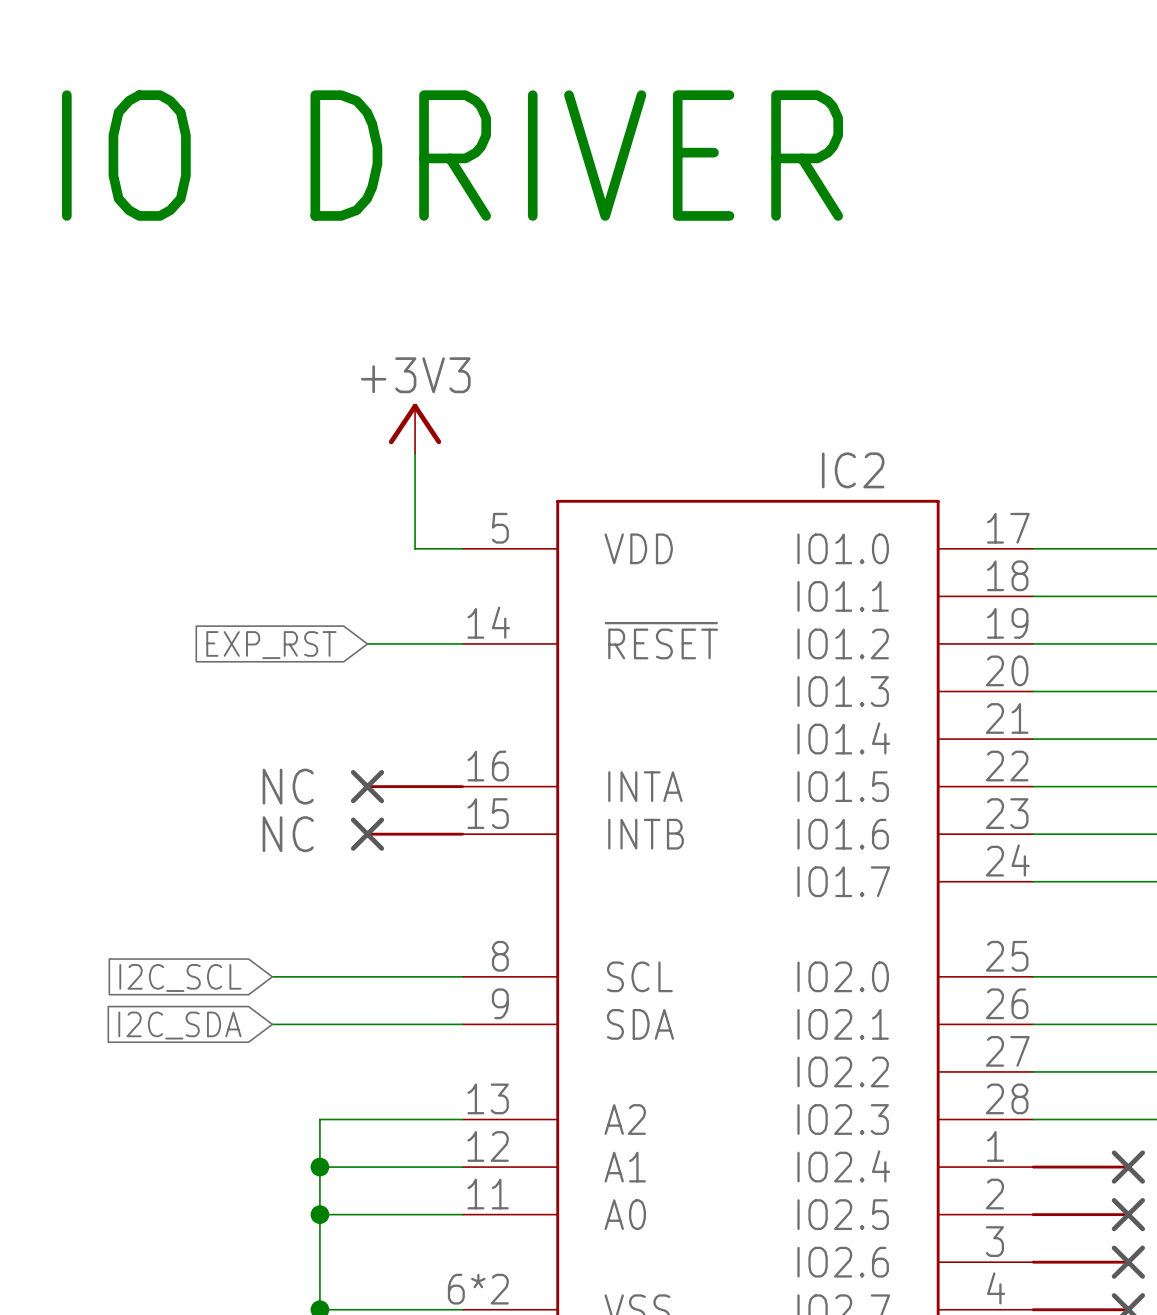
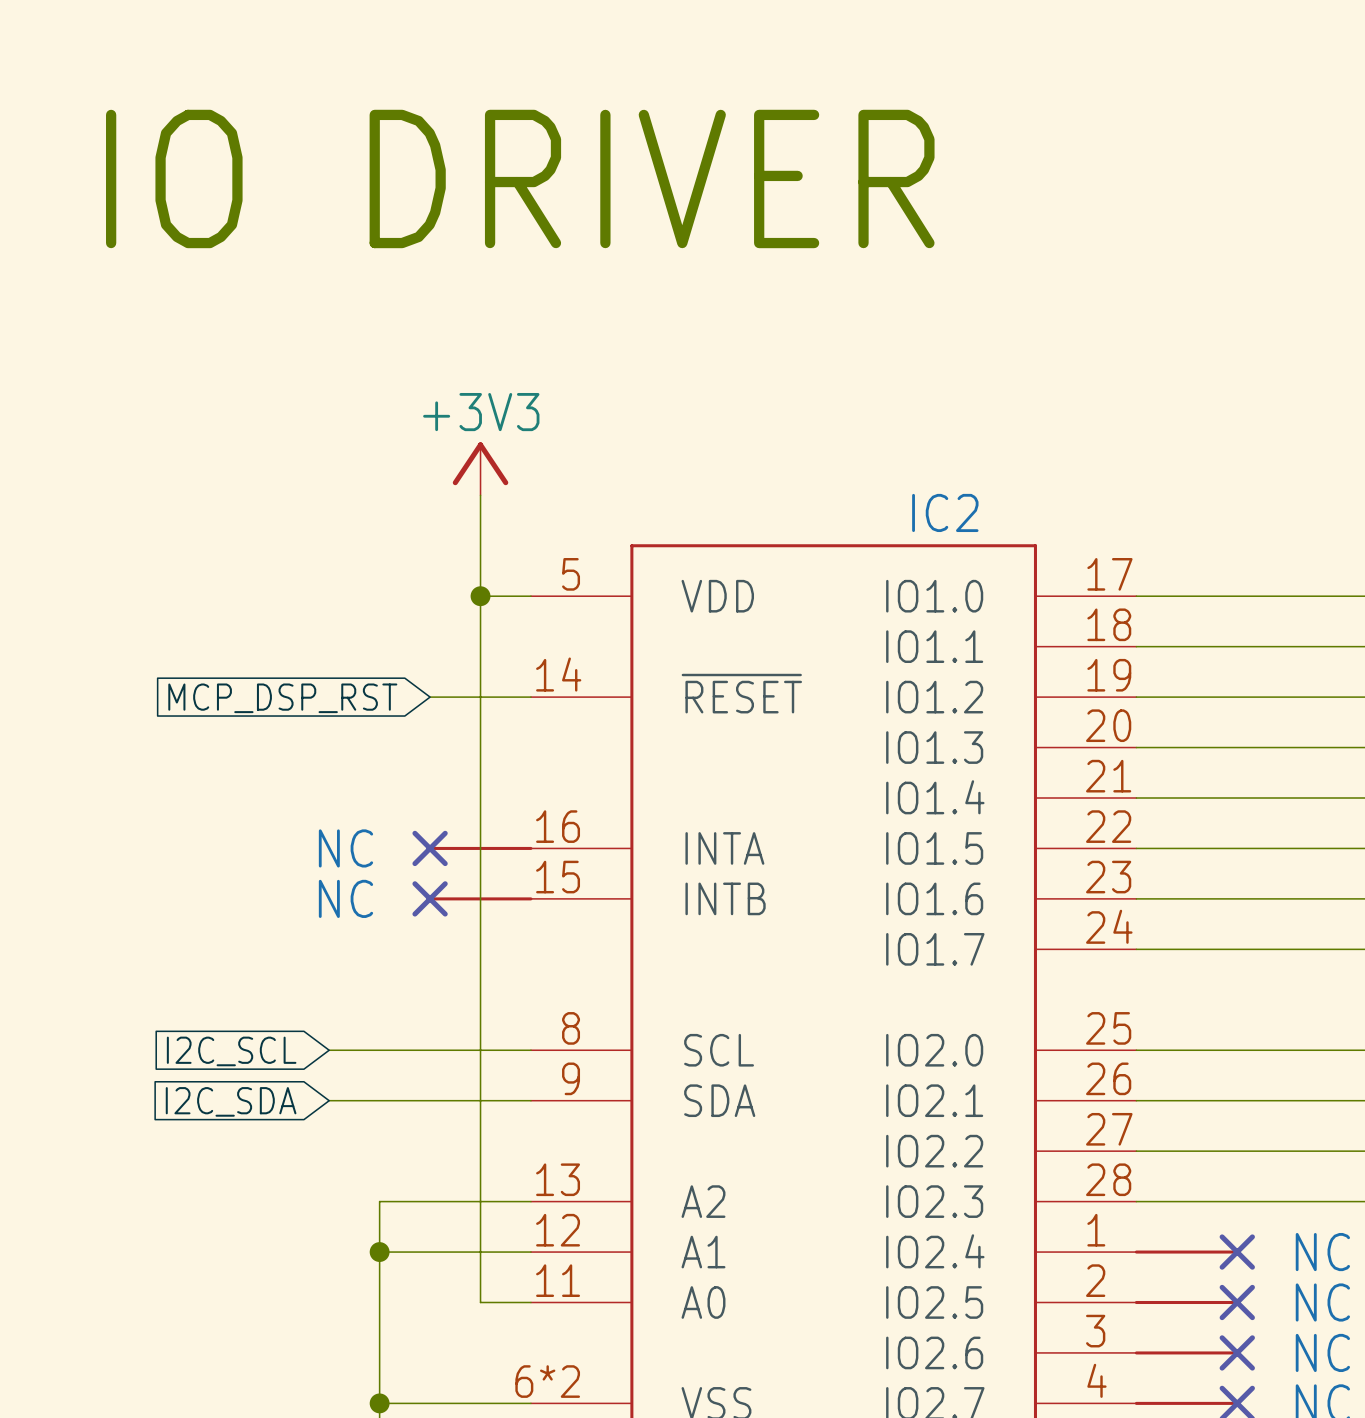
junction: none -> (480, 596)
global label: EXP_RST (271, 645) -> MCP_DSP_RST (282, 698)
wire: (319, 1214) (415, 1214) -> (480, 596) (480, 1302)
junction: (319, 1214) -> none

